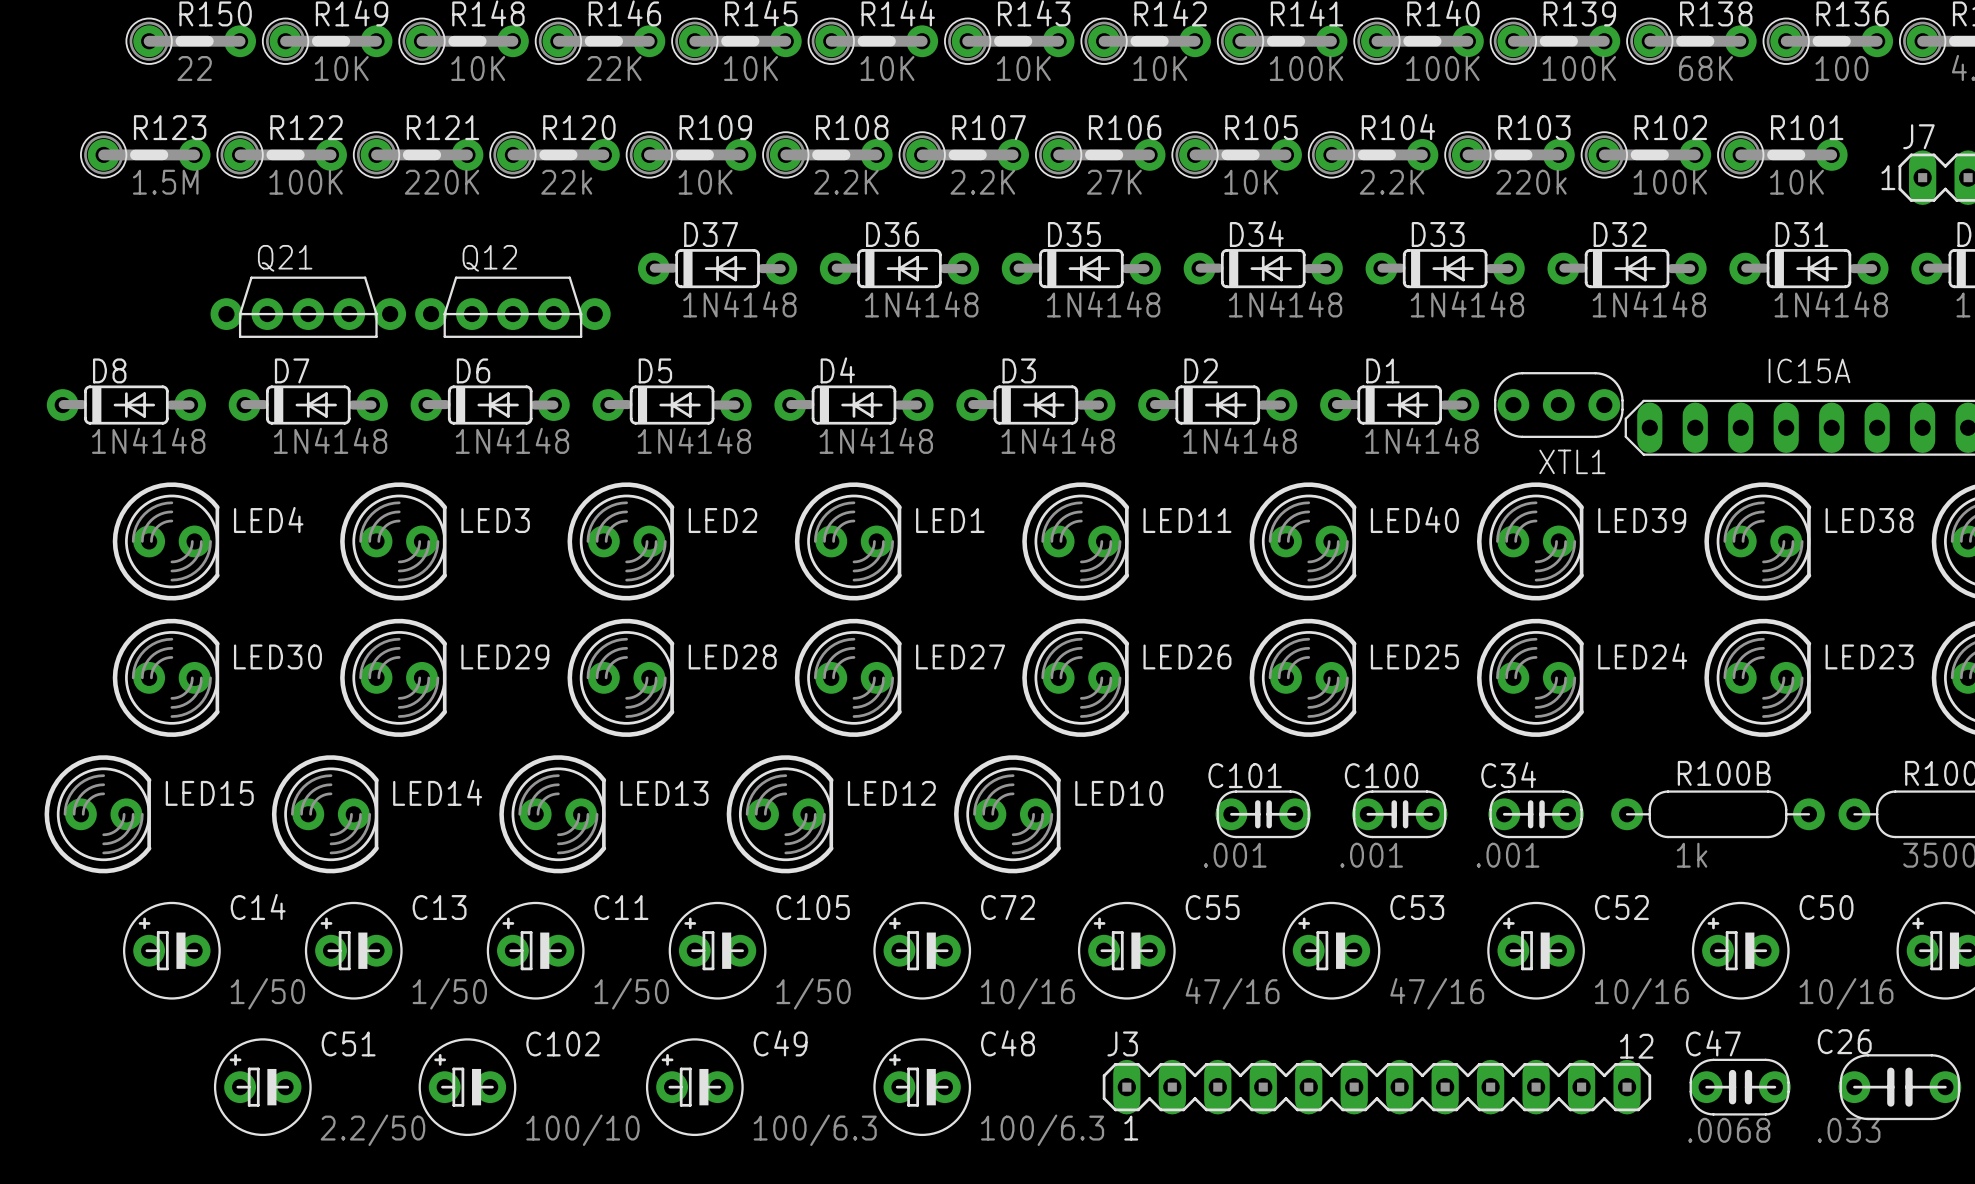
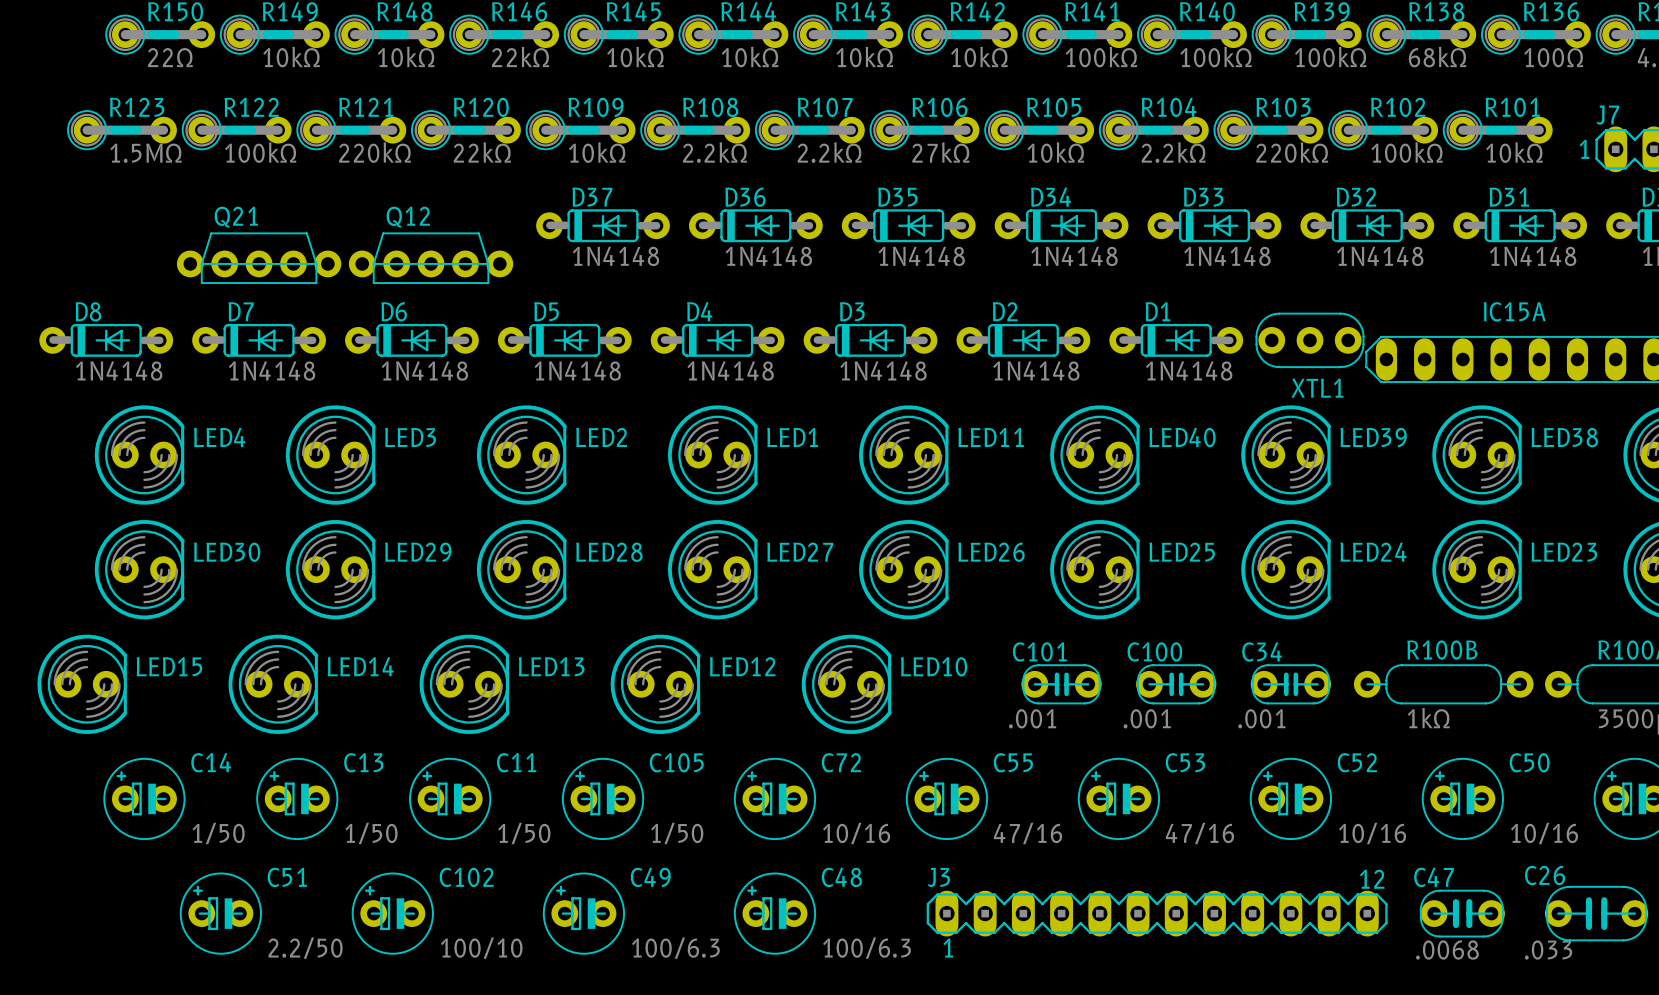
R150 value: 22 (194, 68) -> 22Ω (170, 57)
R149 value: 10K (341, 68) -> 10kΩ (291, 57)
R148 value: 10K (478, 68) -> 10kΩ (406, 57)
R146 value: 22K (614, 68) -> 22kΩ (520, 56)
R145 value: 10K (751, 68) -> 10kΩ (635, 57)
R144 value: 10K (887, 68) -> 10kΩ (750, 57)
R143 value: 10K (1023, 68) -> 10kΩ (864, 57)
R142 value: 10K (1160, 68) -> 10kΩ (979, 57)
R141 value: 100K (1306, 68) -> 100kΩ (1101, 57)
R140 value: 100K (1442, 68) -> 100kΩ (1216, 57)
R139 value: 100K (1579, 68) -> 100kΩ (1330, 57)
R138 value: 68K (1706, 68) -> 68kΩ (1437, 57)
R136 value: 100 (1841, 68) -> 100Ω (1553, 57)
R123 value: 1.5M (165, 182) -> 1.5MΩ (146, 153)
R122 value: 100K (306, 182) -> 100kΩ (260, 152)
R121 value: 220K (441, 182) -> 220kΩ (375, 152)
R120 value: 22k (566, 182) -> 22kΩ (482, 152)
R109 value: 10K (705, 182) -> 10kΩ (597, 152)
R108 value: 2.2K (846, 182) -> 2.2kΩ (715, 152)
R107 value: 2.2K (982, 182) -> 2.2kΩ (829, 152)
R106 value: 27K (1114, 182) -> 27kΩ (940, 152)
R105 value: 10K (1251, 182) -> 10kΩ (1055, 152)
R104 value: 2.2K (1392, 182) -> 2.2kΩ (1173, 152)
R103 value: 220k (1531, 182) -> 220kΩ (1292, 152)
R102 value: 100K (1670, 182) -> 100kΩ (1407, 152)
R101 value: 10K (1796, 182) -> 10kΩ (1514, 152)
R100B value: 1k (1692, 855) -> 1kΩ (1428, 718)

